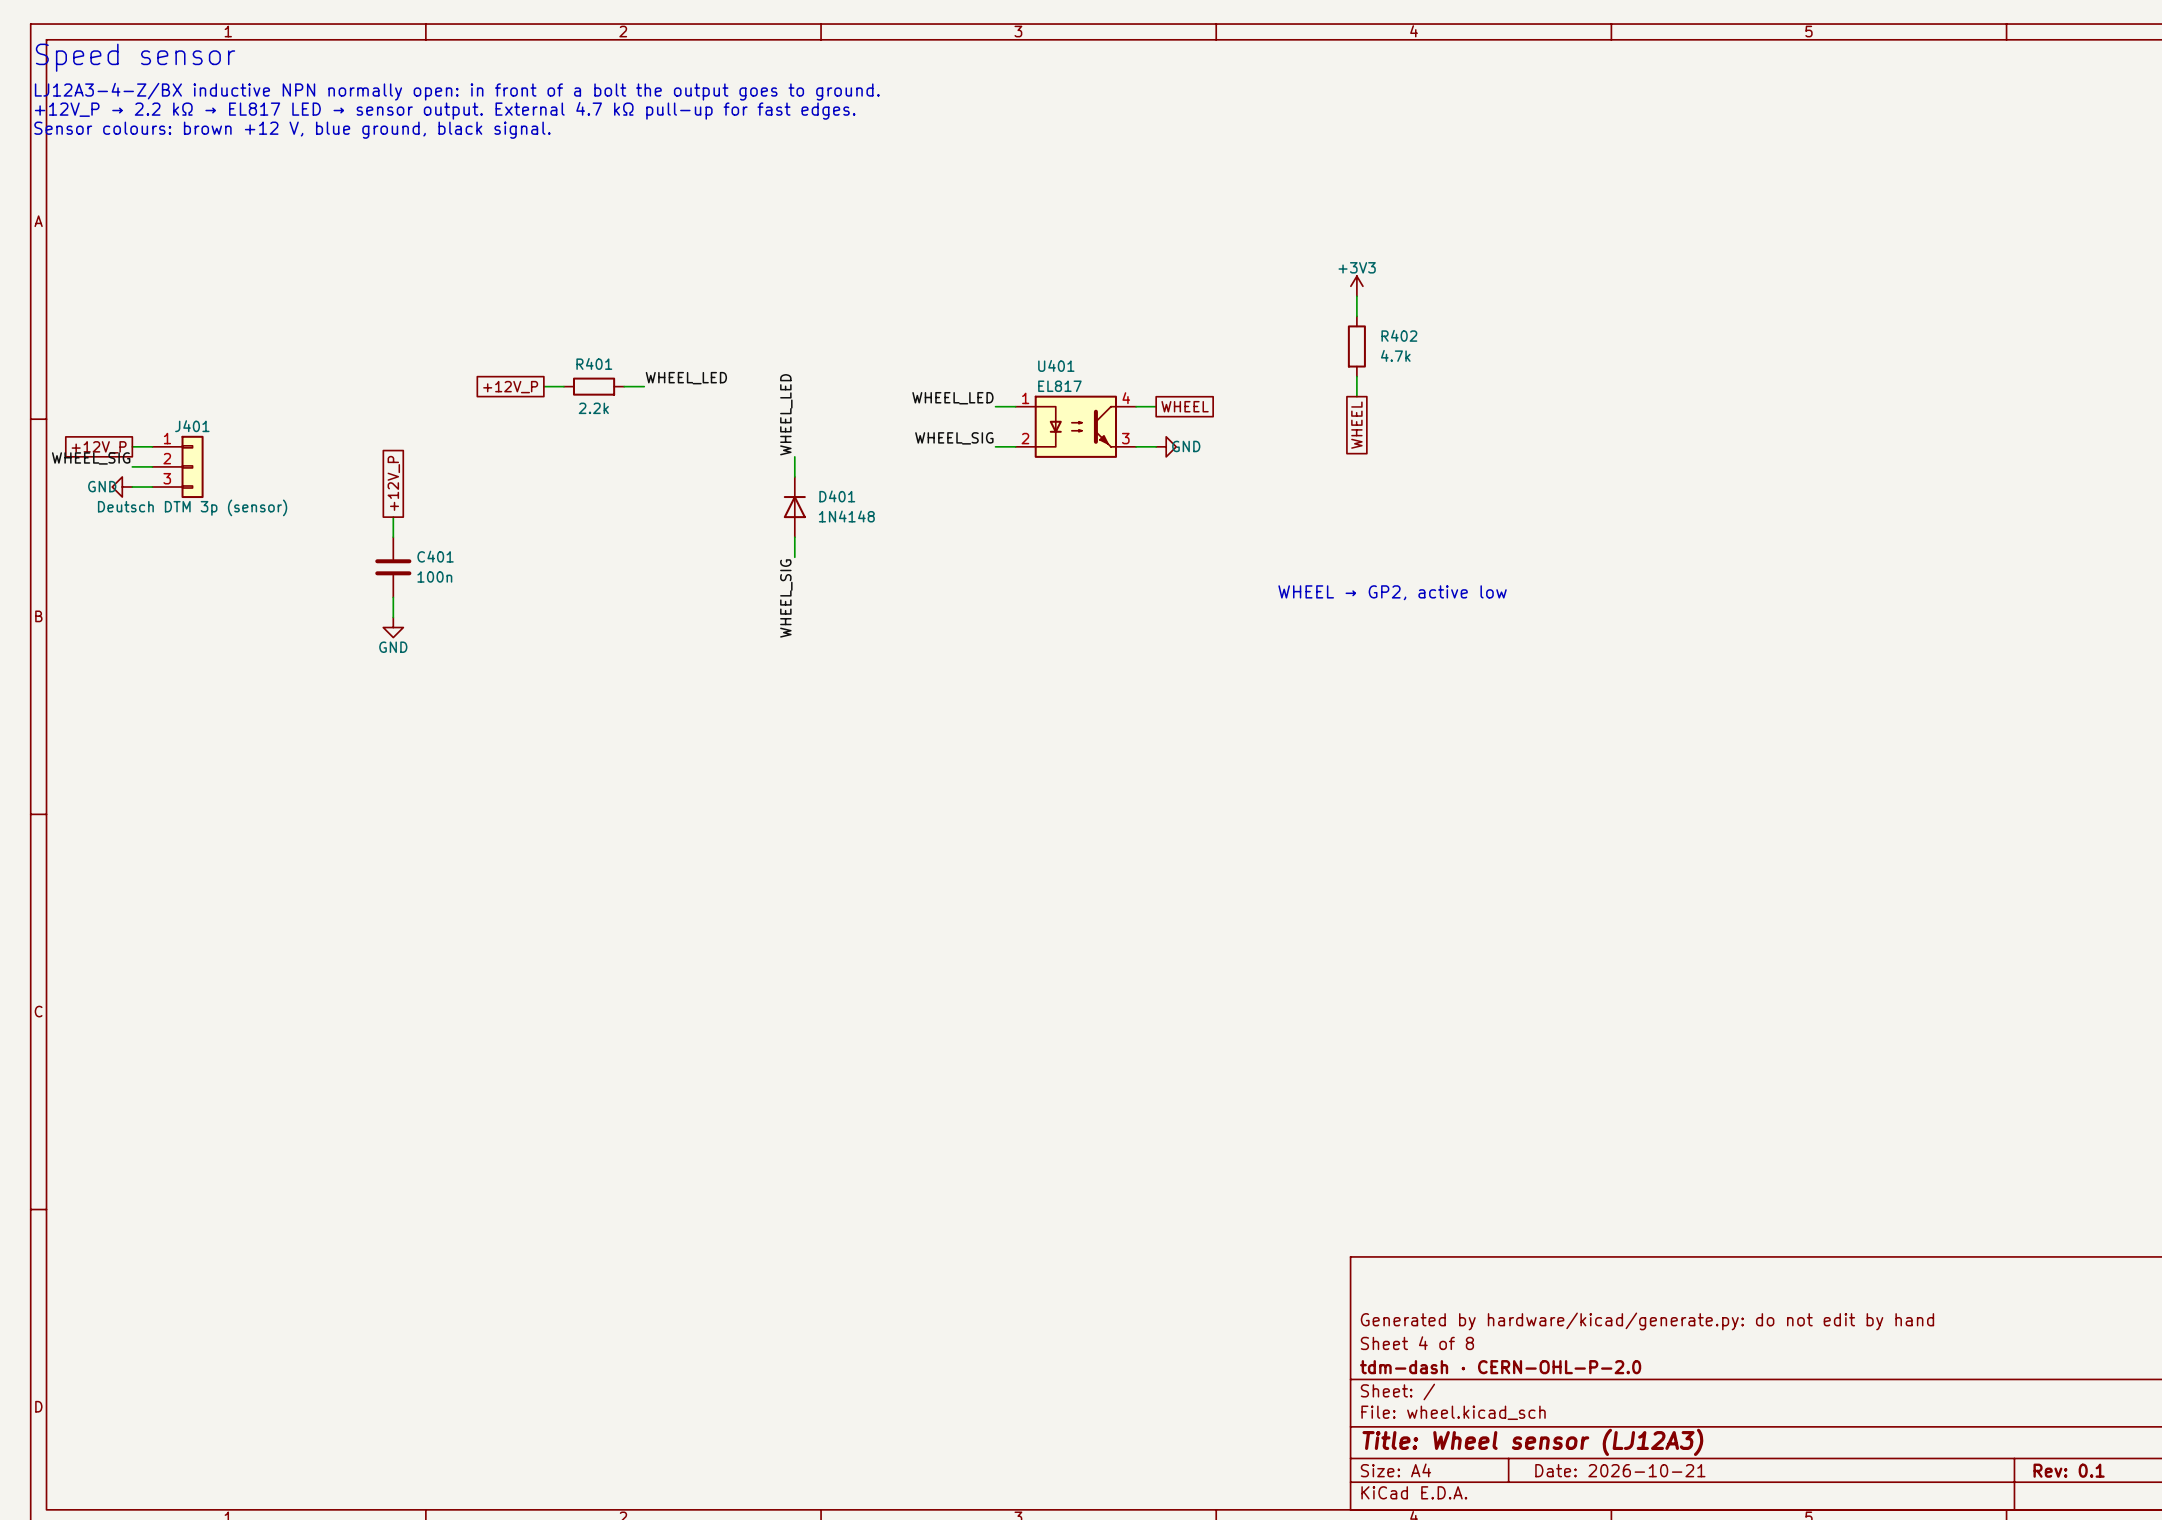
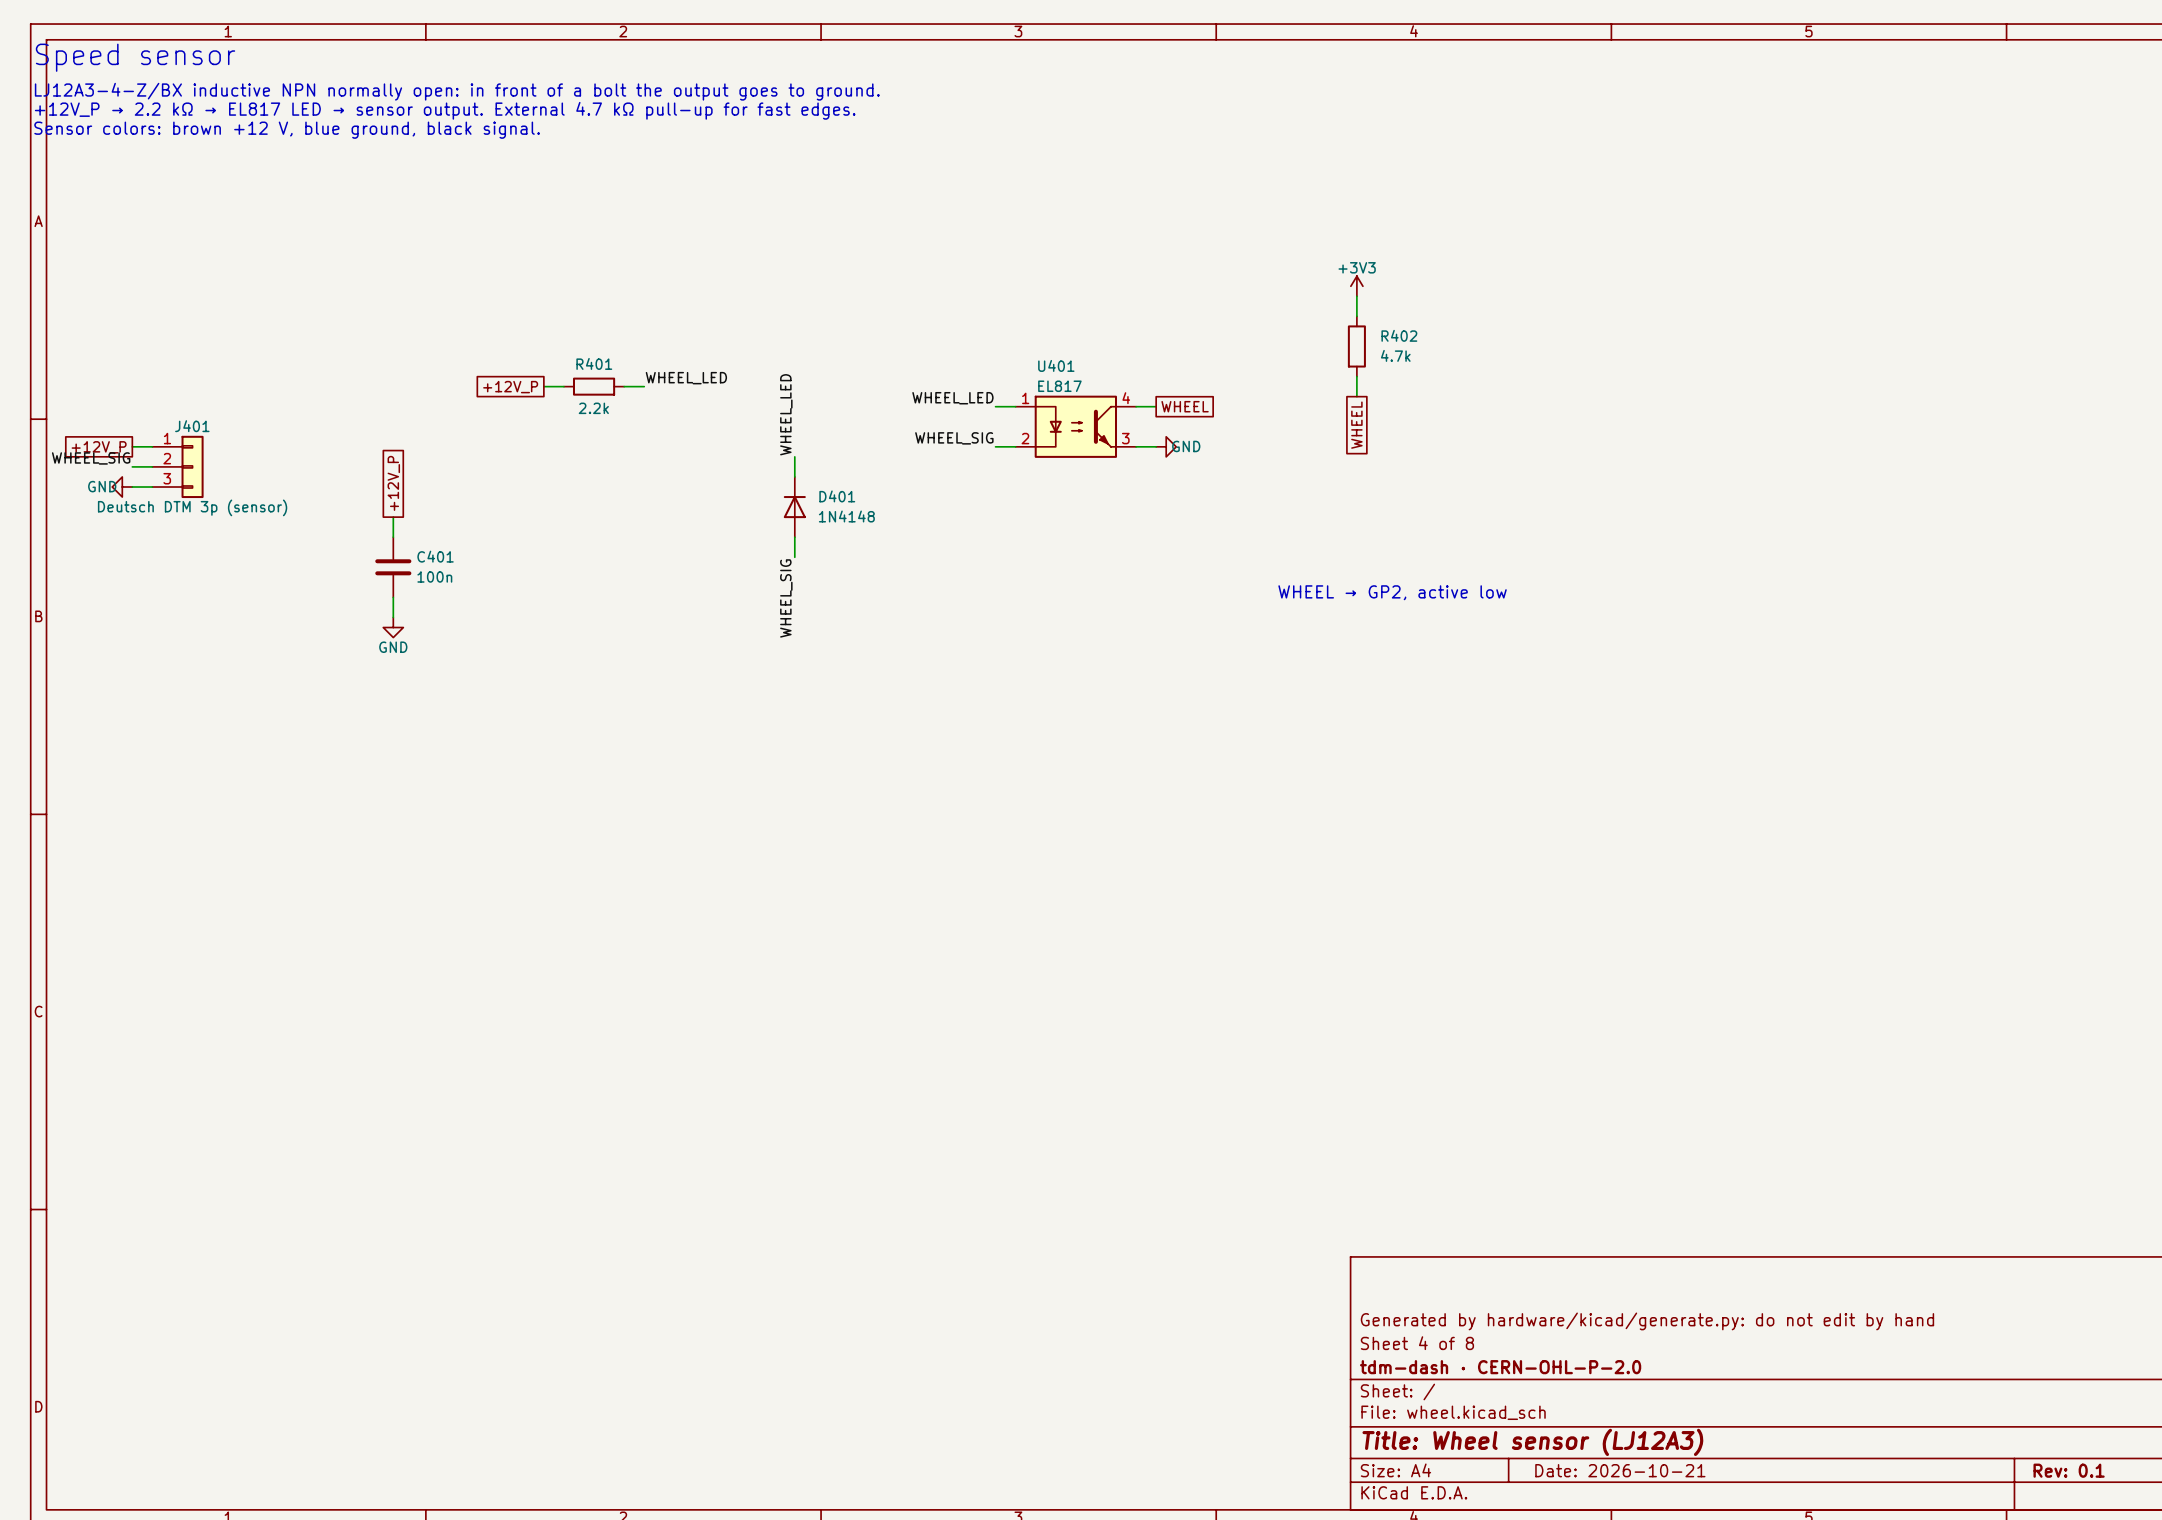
text: Sensor colours: brown +12 V, blue ground, black signal. (292, 130) -> Sensor colors: brown +12 V, blue ground, black signal. (287, 130)

